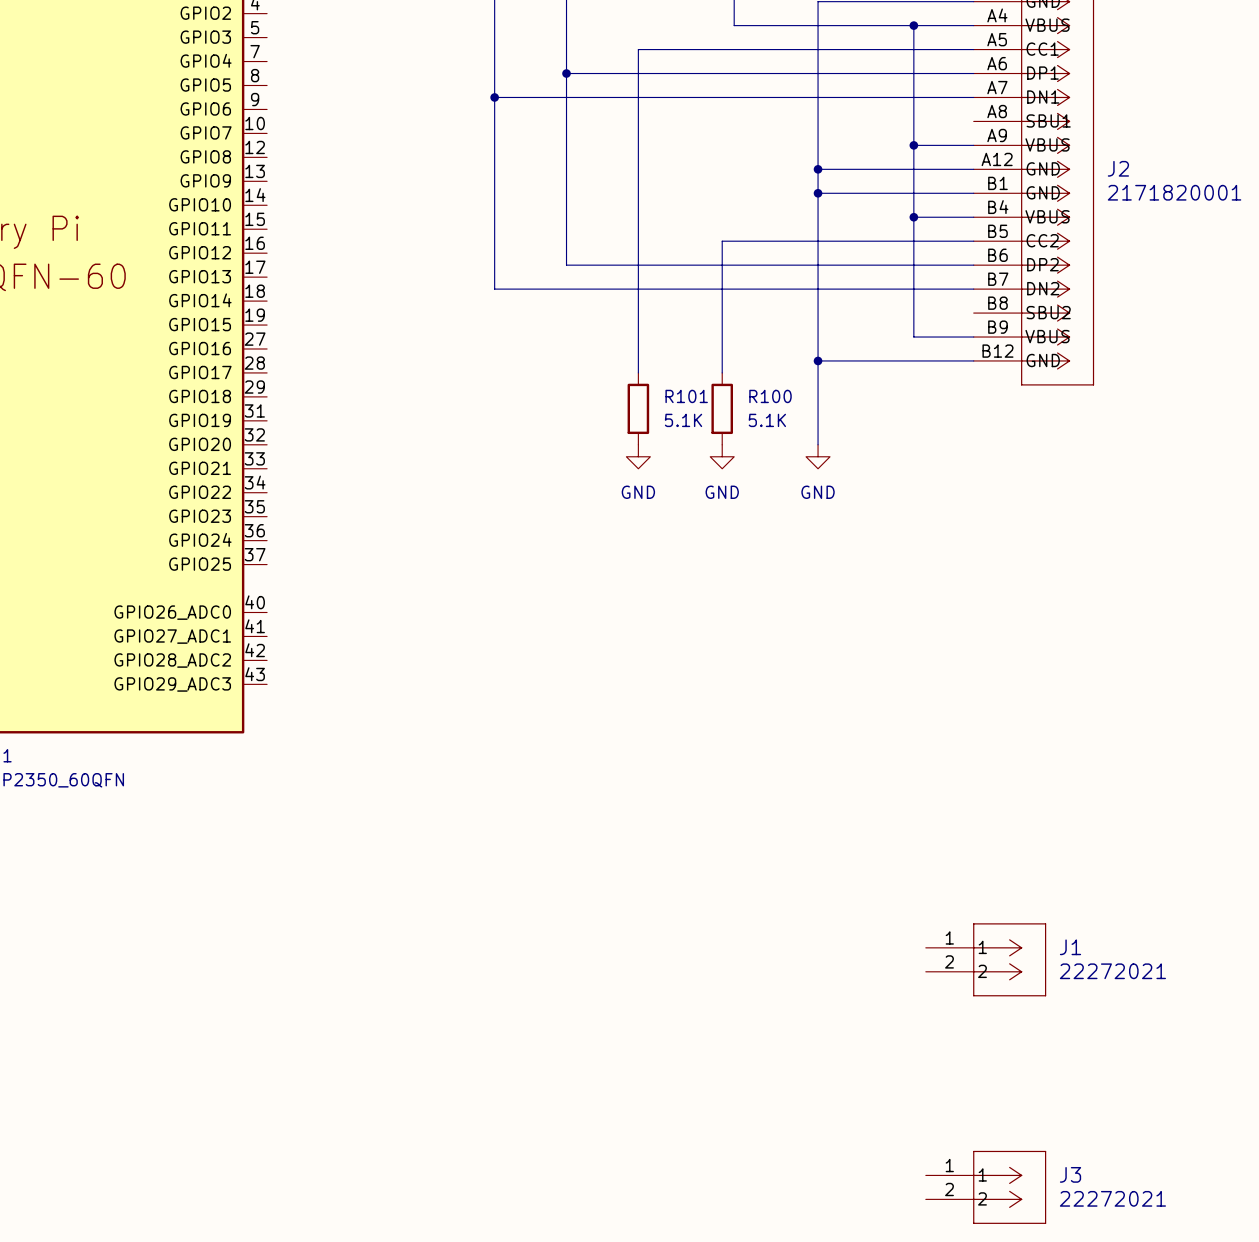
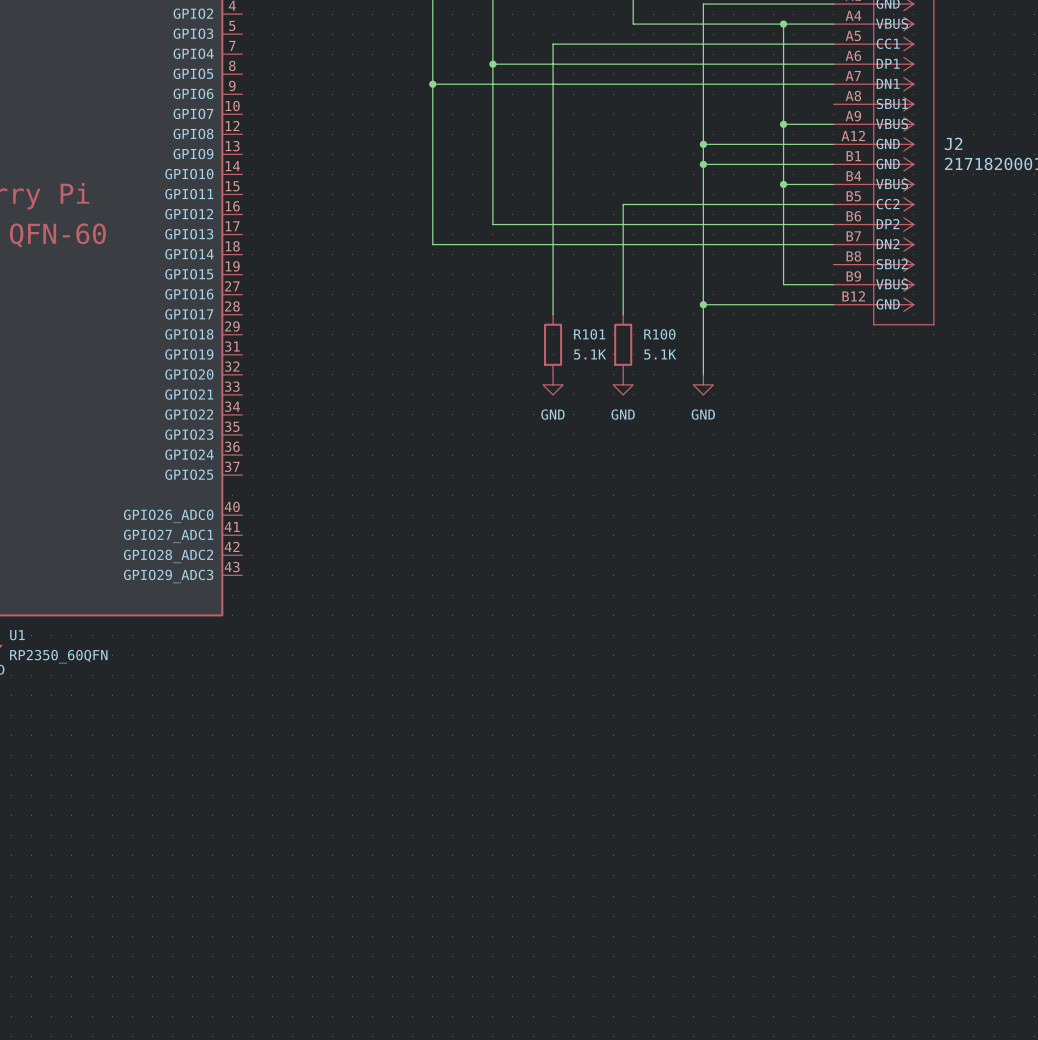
J1: 22272021 (986, 959) -> none
J3: 22272021 (986, 1187) -> none

